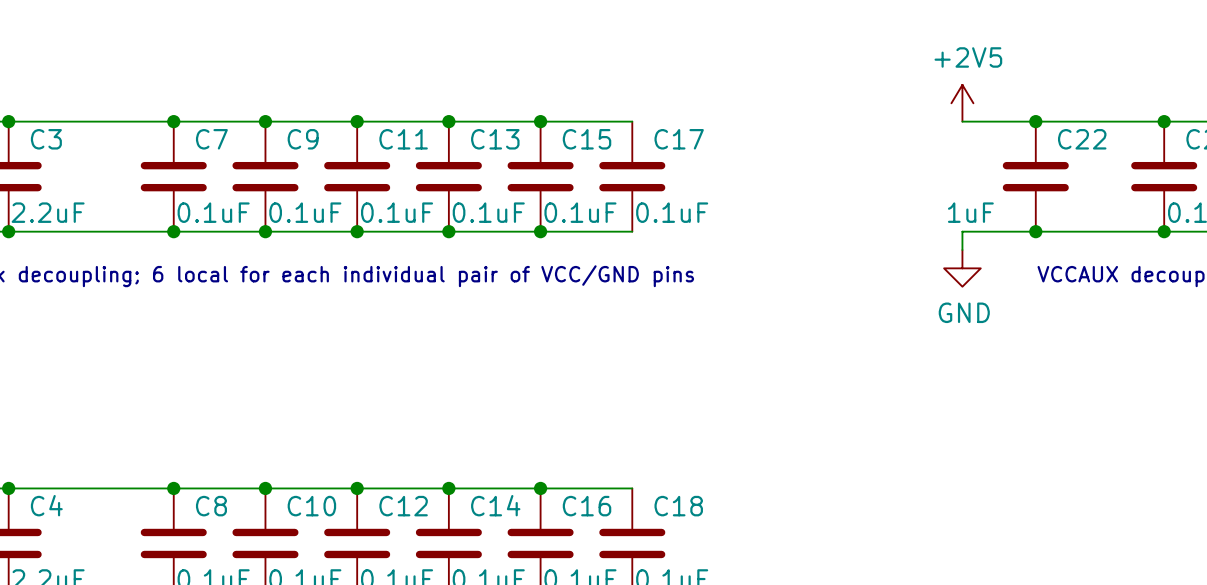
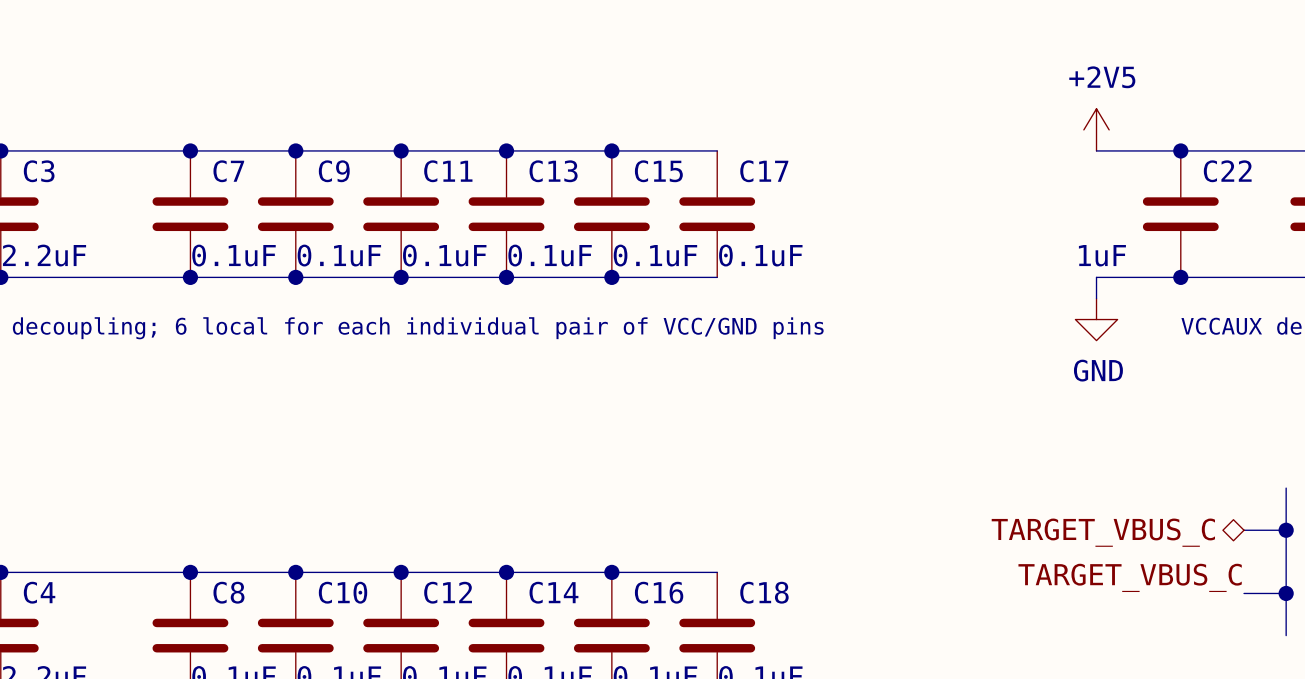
wire: none -> (1286, 488) (1286, 635)
hierarchical label: none -> TARGET_VBUS_C (1103, 532)
wire: none -> (1244, 530) (1286, 530)
junction: none -> (1286, 530)
label: none -> TARGET_VBUS_C (1130, 577)
wire: none -> (1244, 593) (1286, 593)
junction: none -> (1286, 593)

